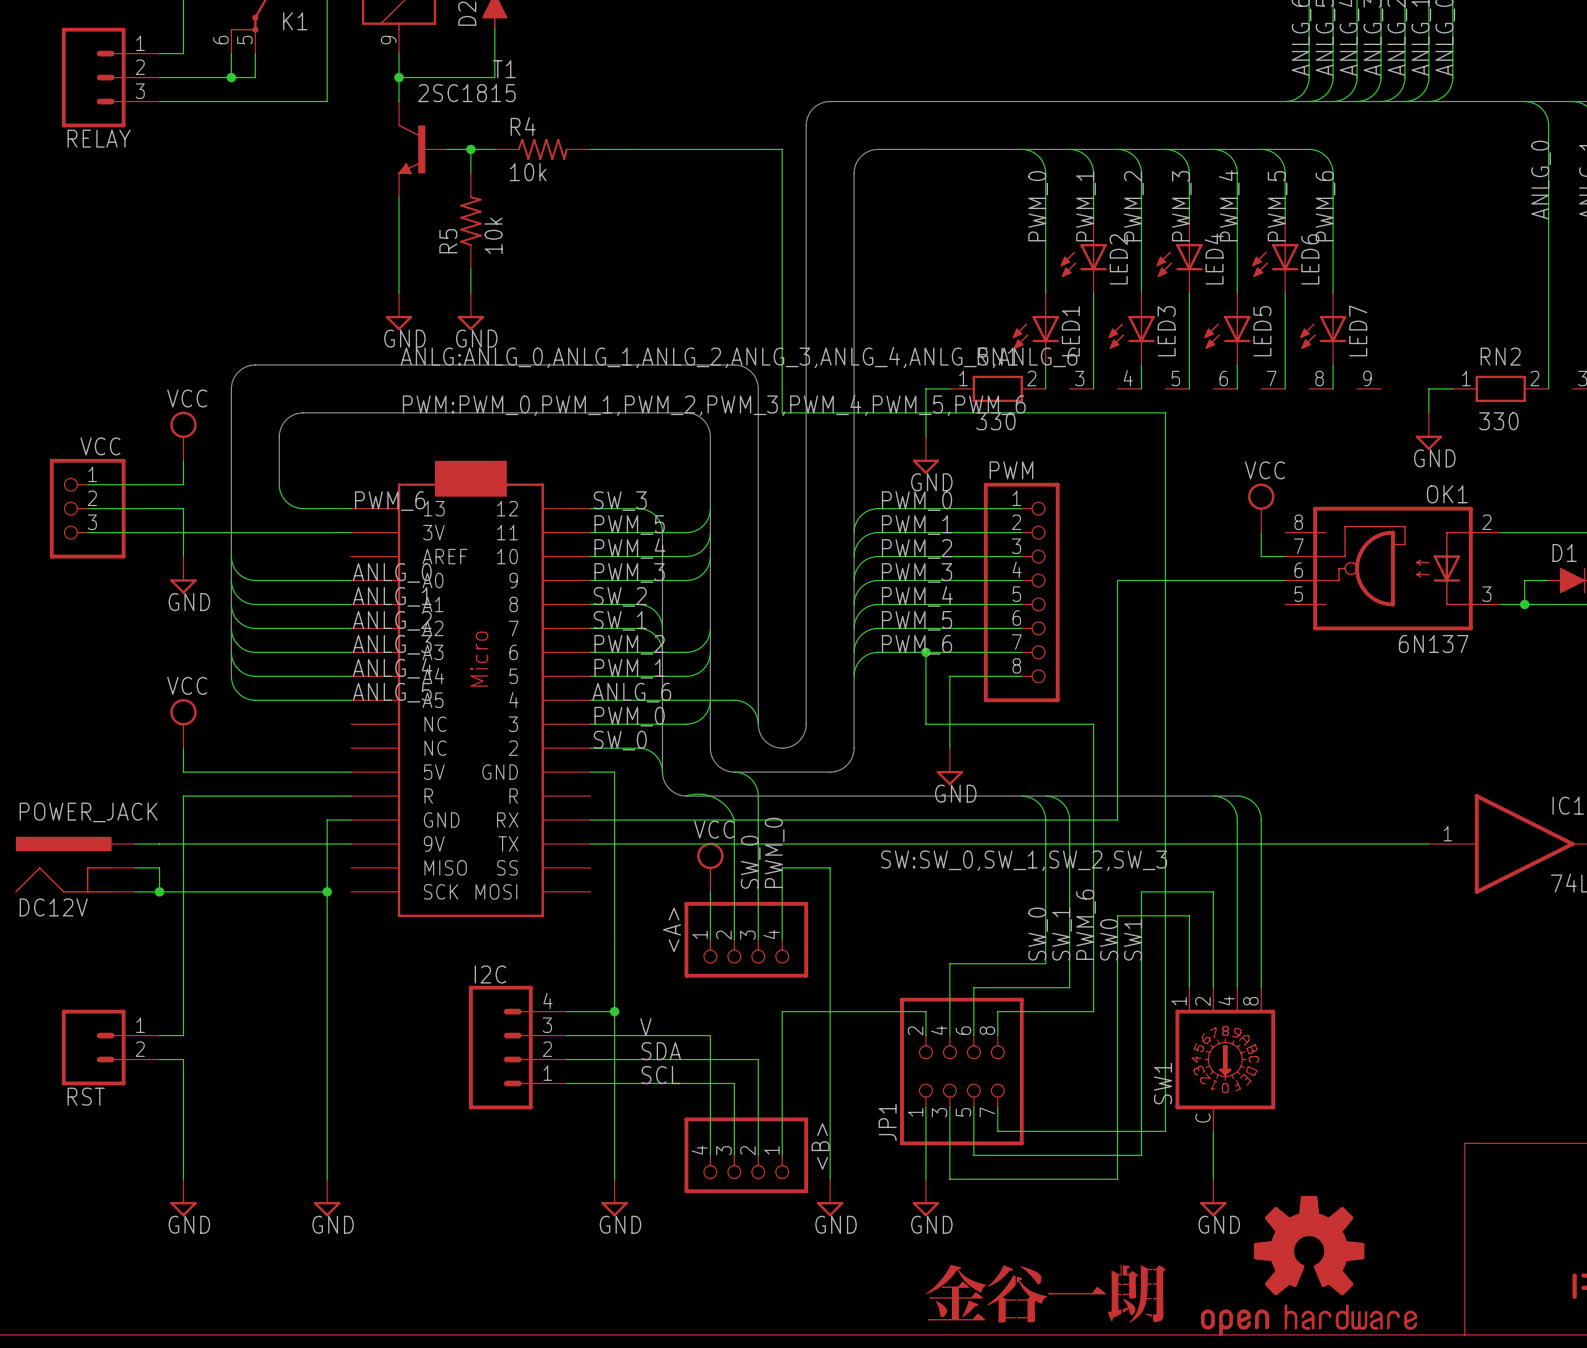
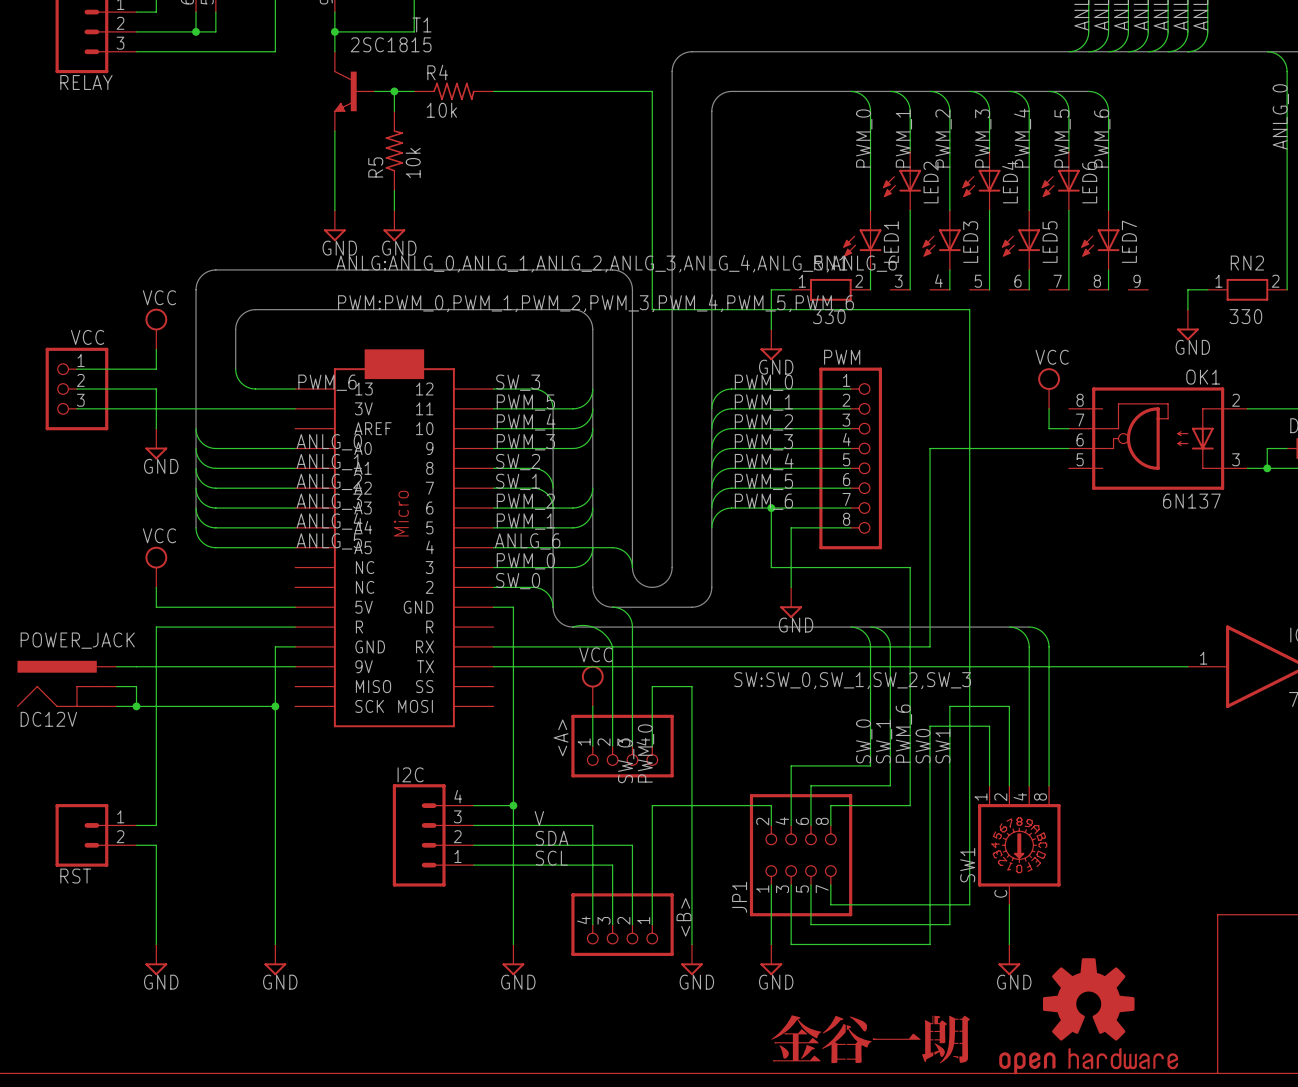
label position: PWM_0 (774, 852) -> PWM_0 (646, 753)
label position: SW_0 (750, 862) -> SW_0 (626, 761)

